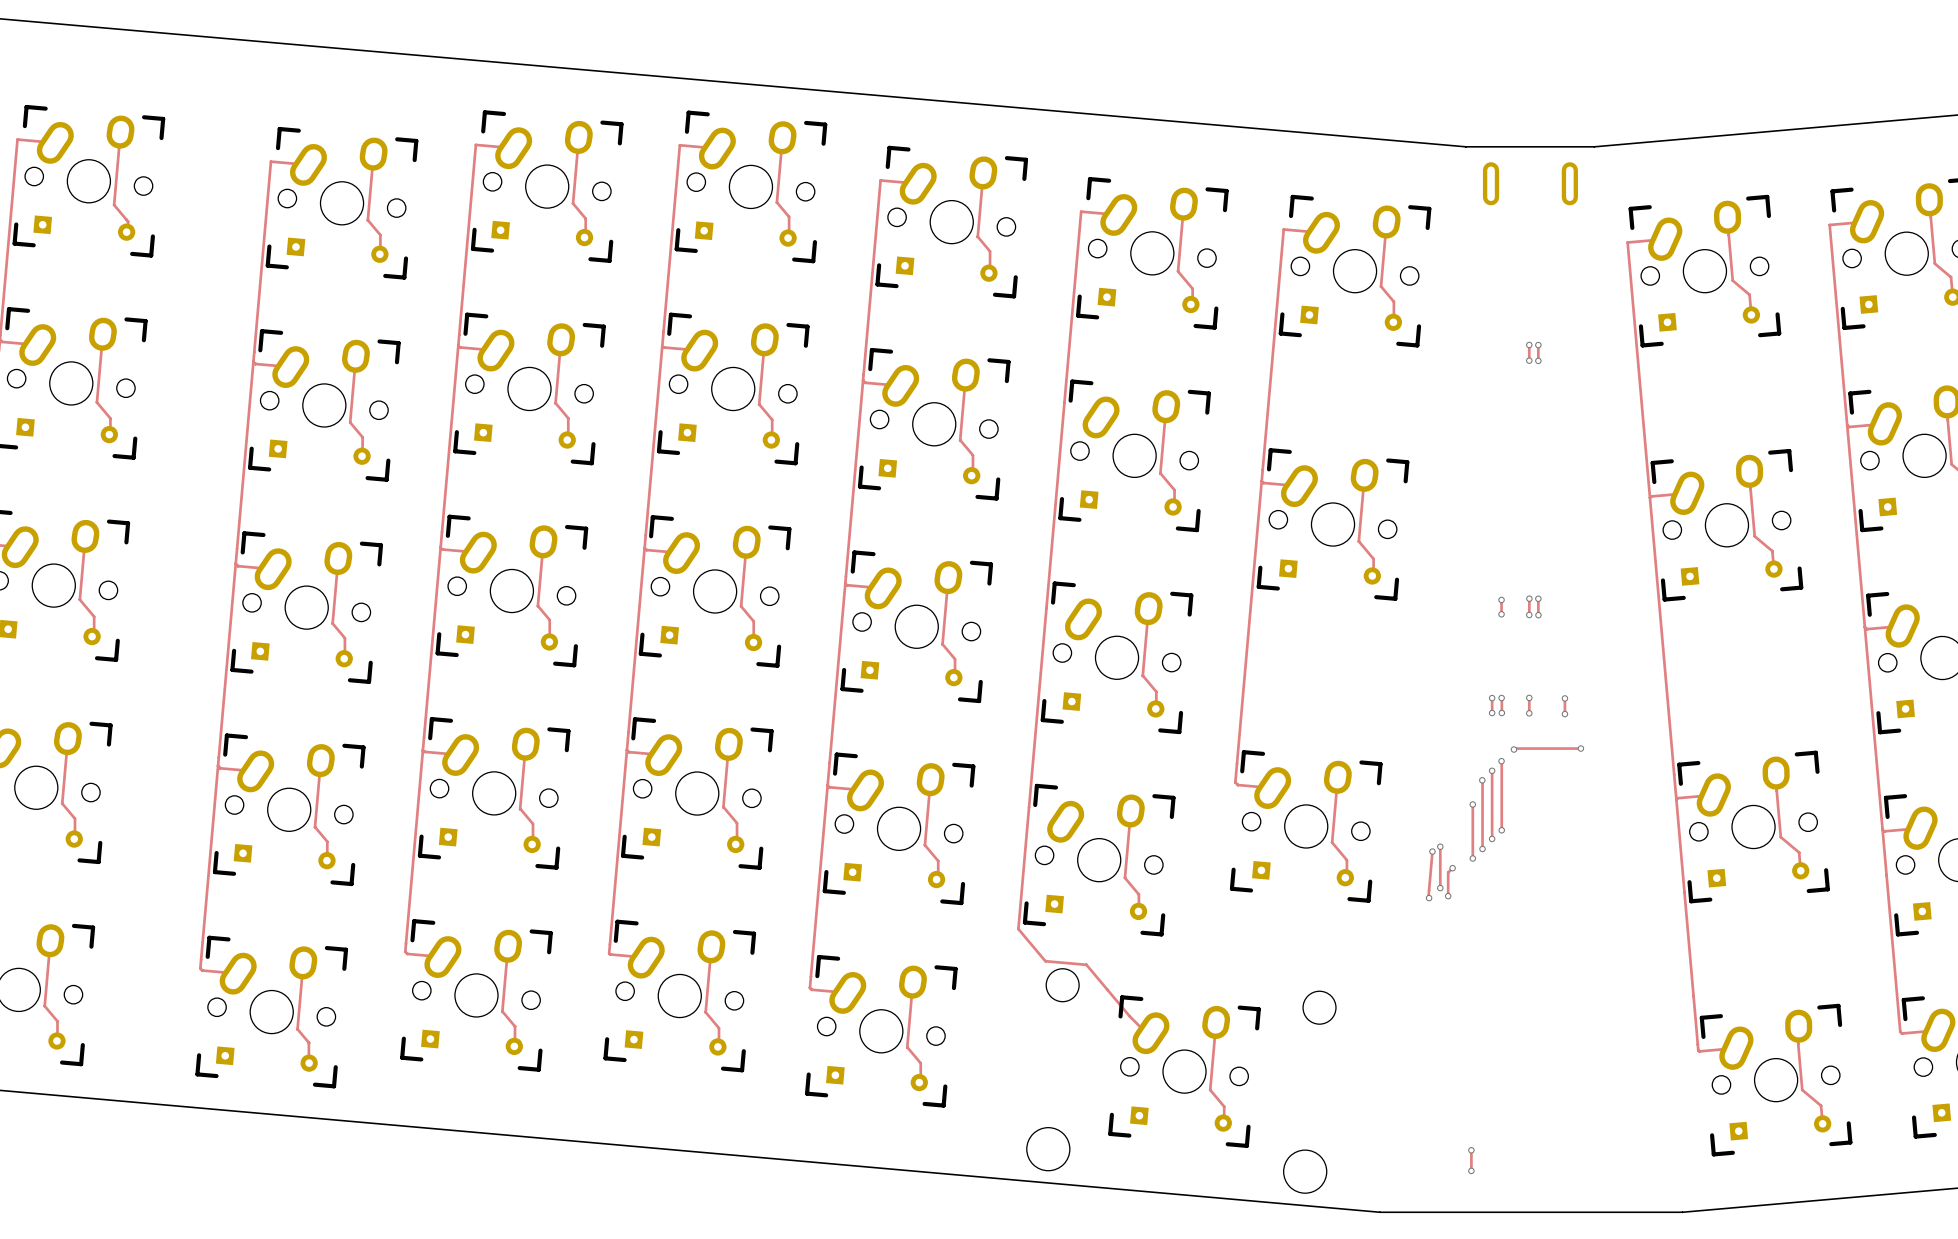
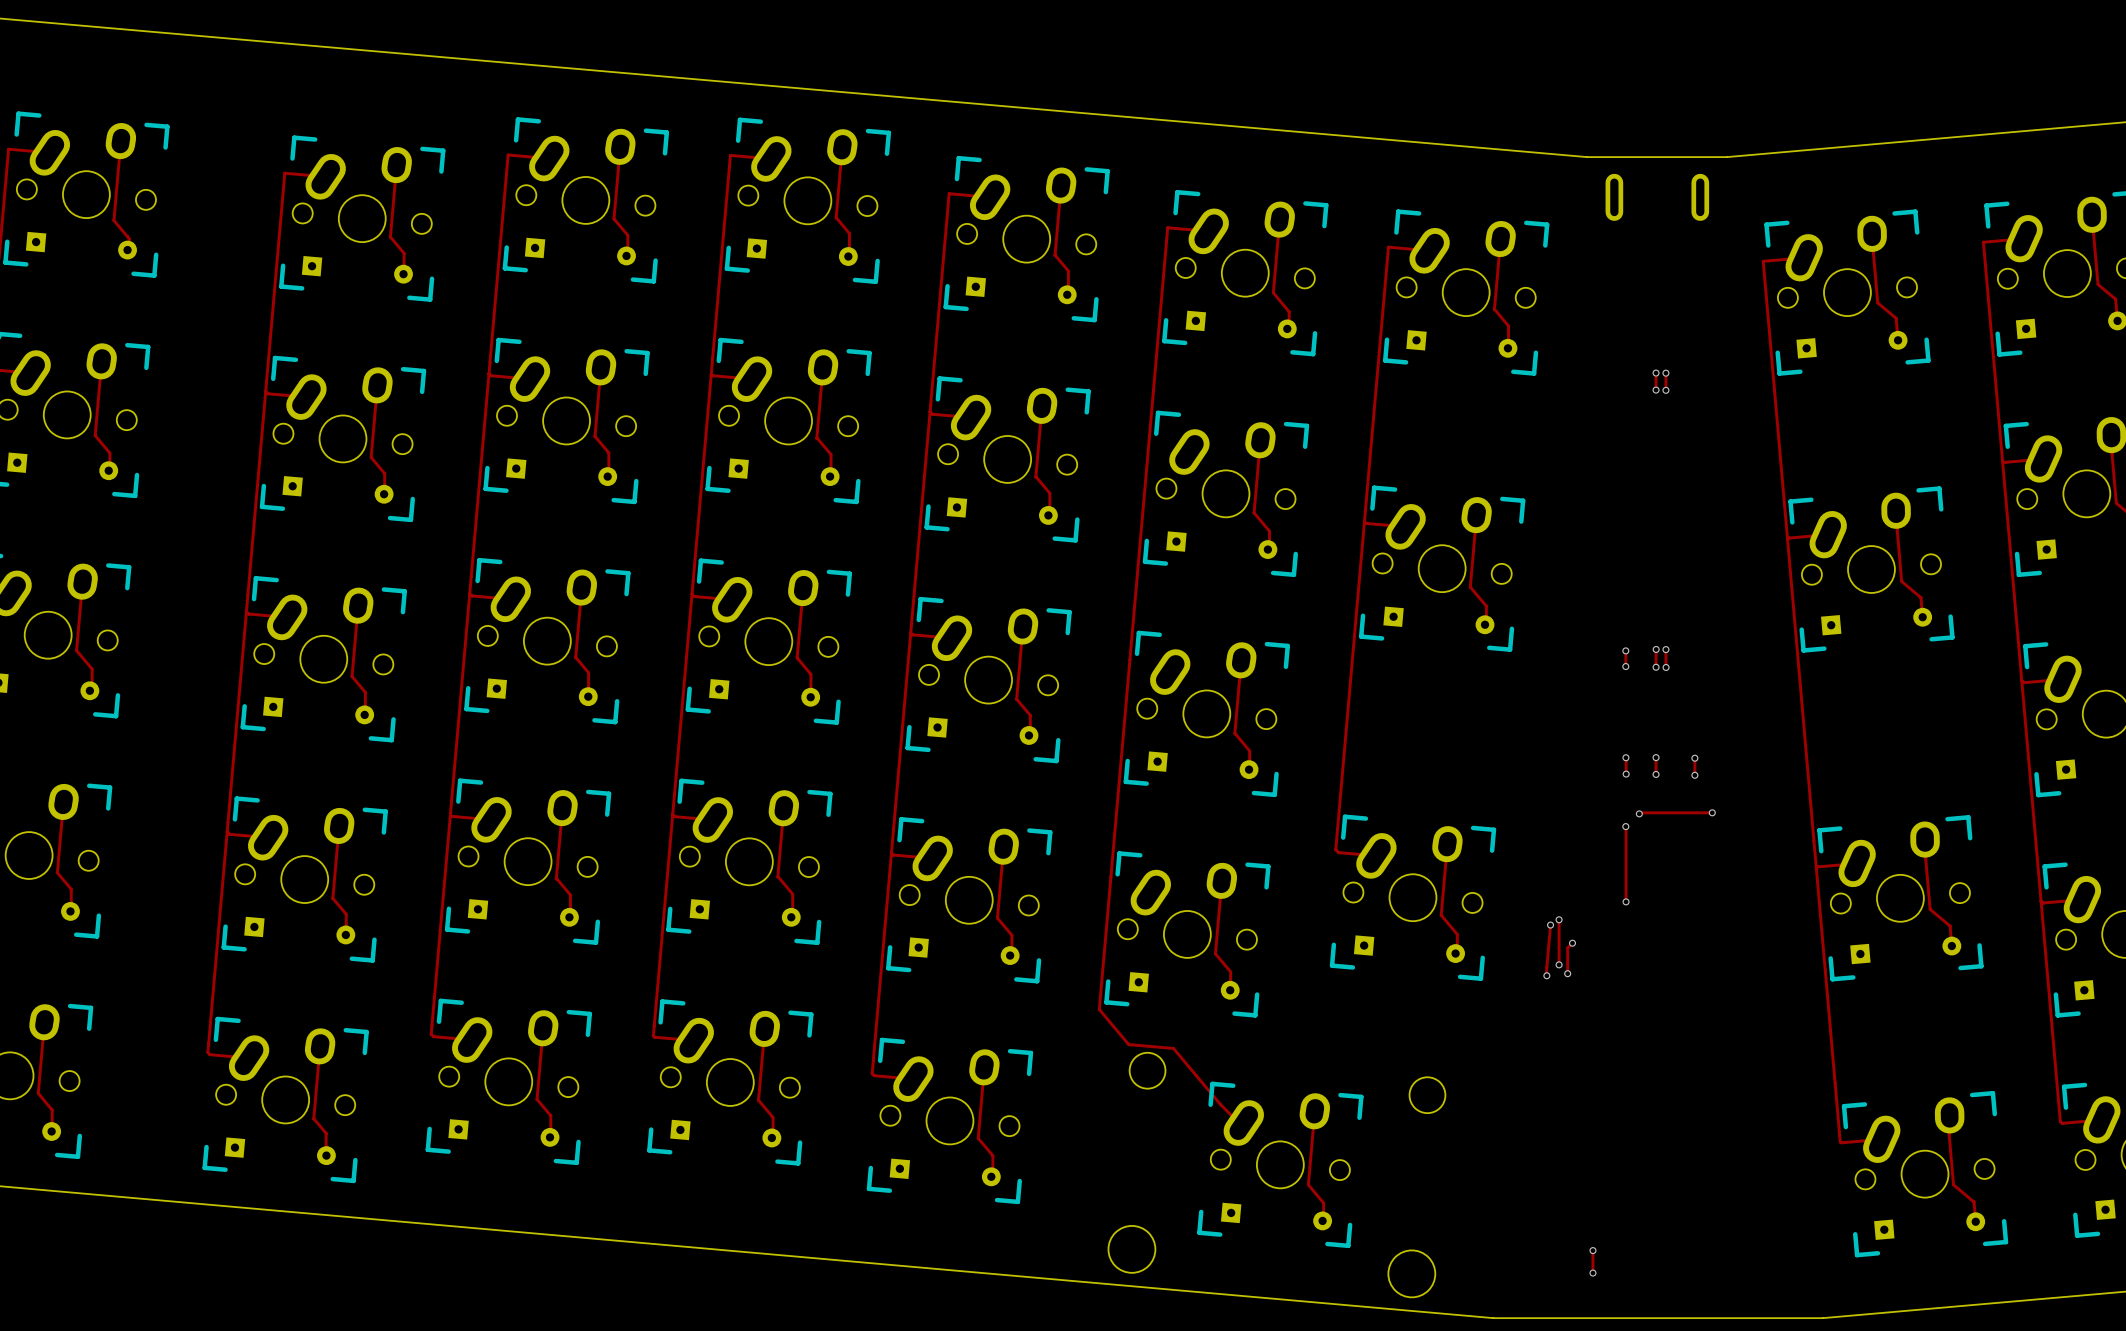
track: (1492, 698) (1492, 713) -> none
via: (1492, 698) -> none
via: (1492, 713) -> none
track: (1492, 770) (1492, 838) -> none
via: (1492, 770) -> none
track: (1482, 780) (1482, 848) -> none
via: (1482, 780) -> none
track: (1472, 804) (1472, 858) -> none
via: (1472, 804) -> none
via: (1492, 838) -> none
via: (1482, 848) -> none
via: (1472, 858) -> none

